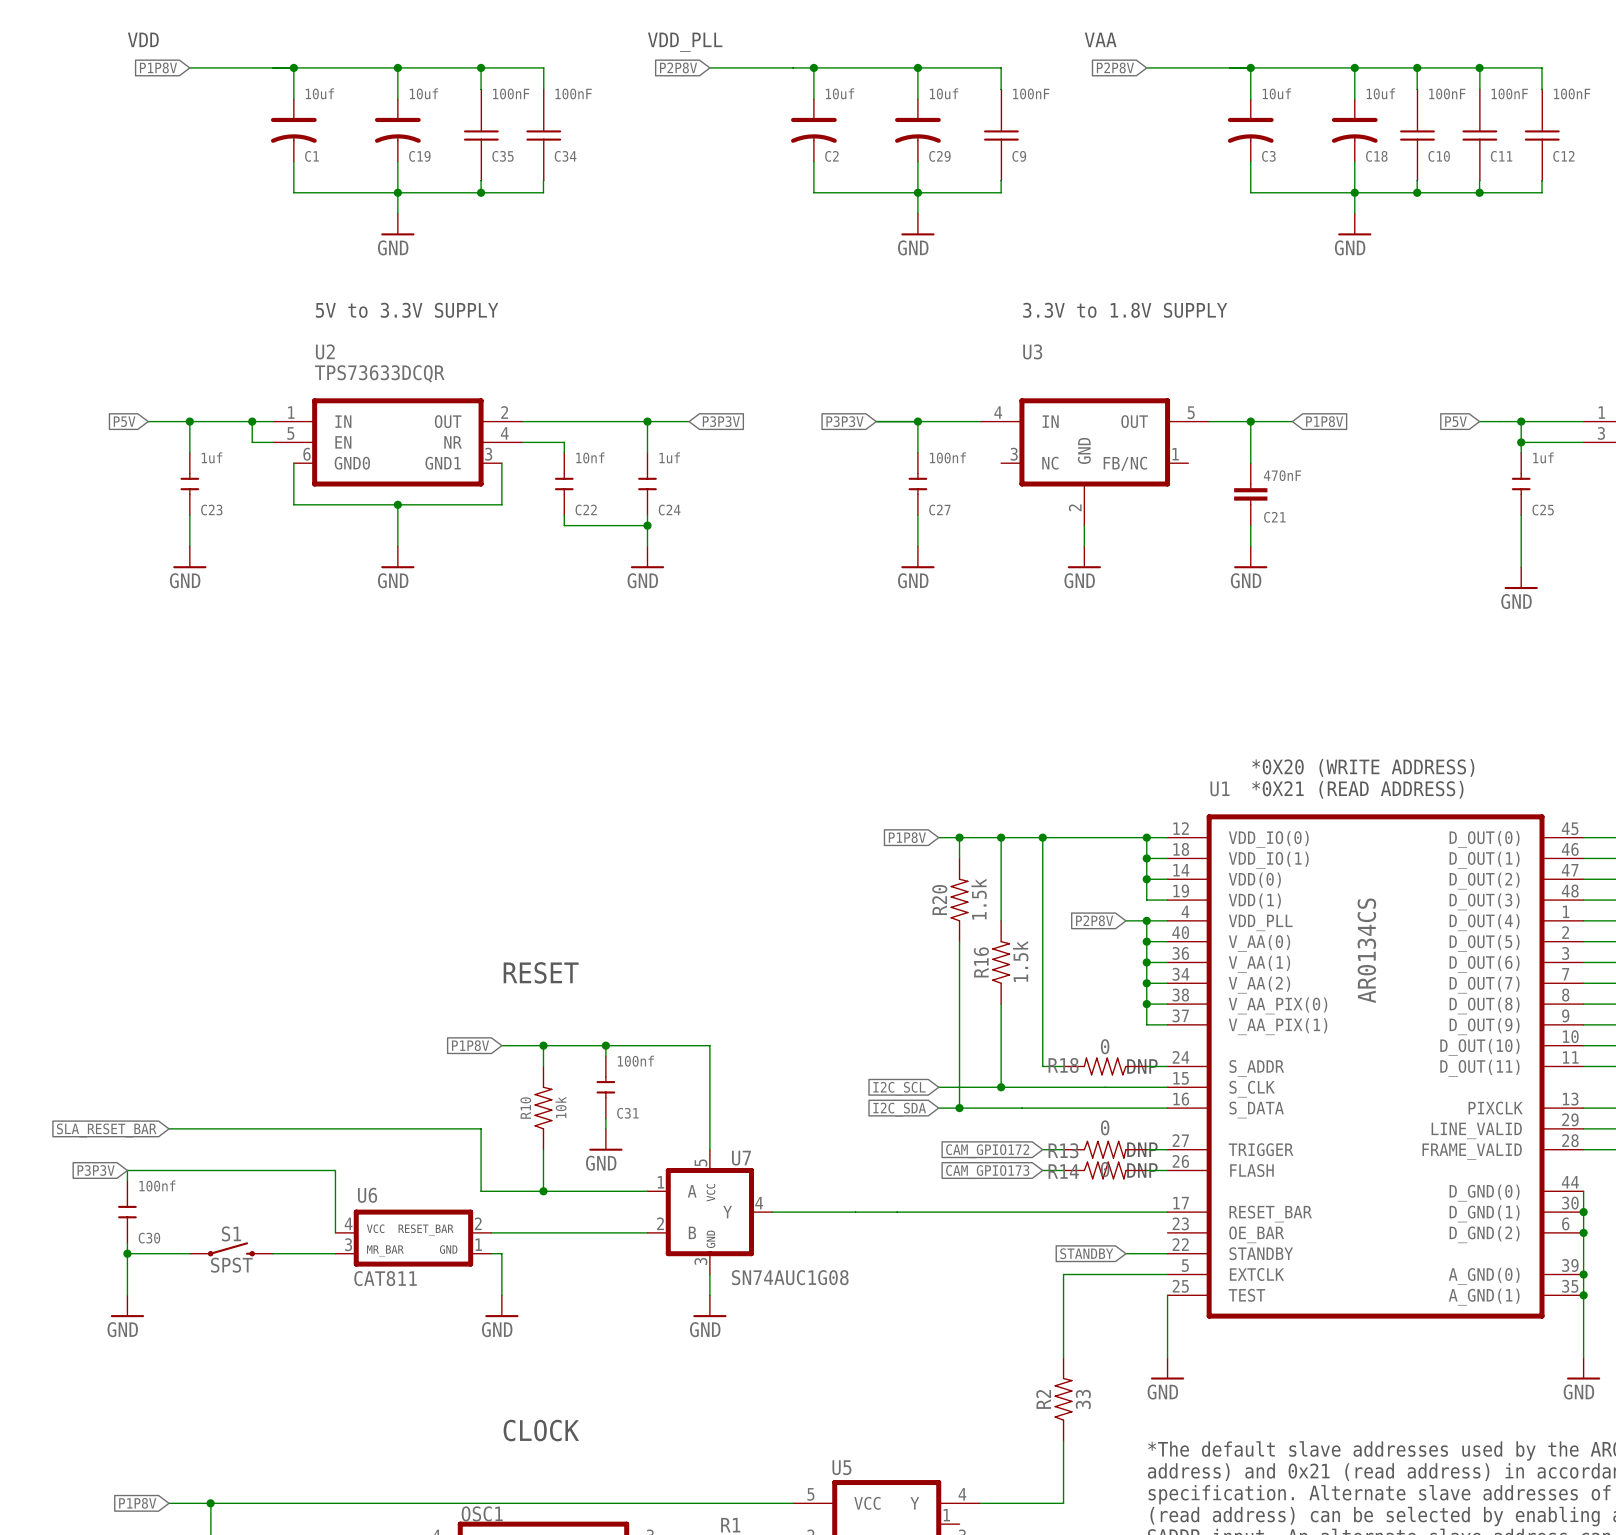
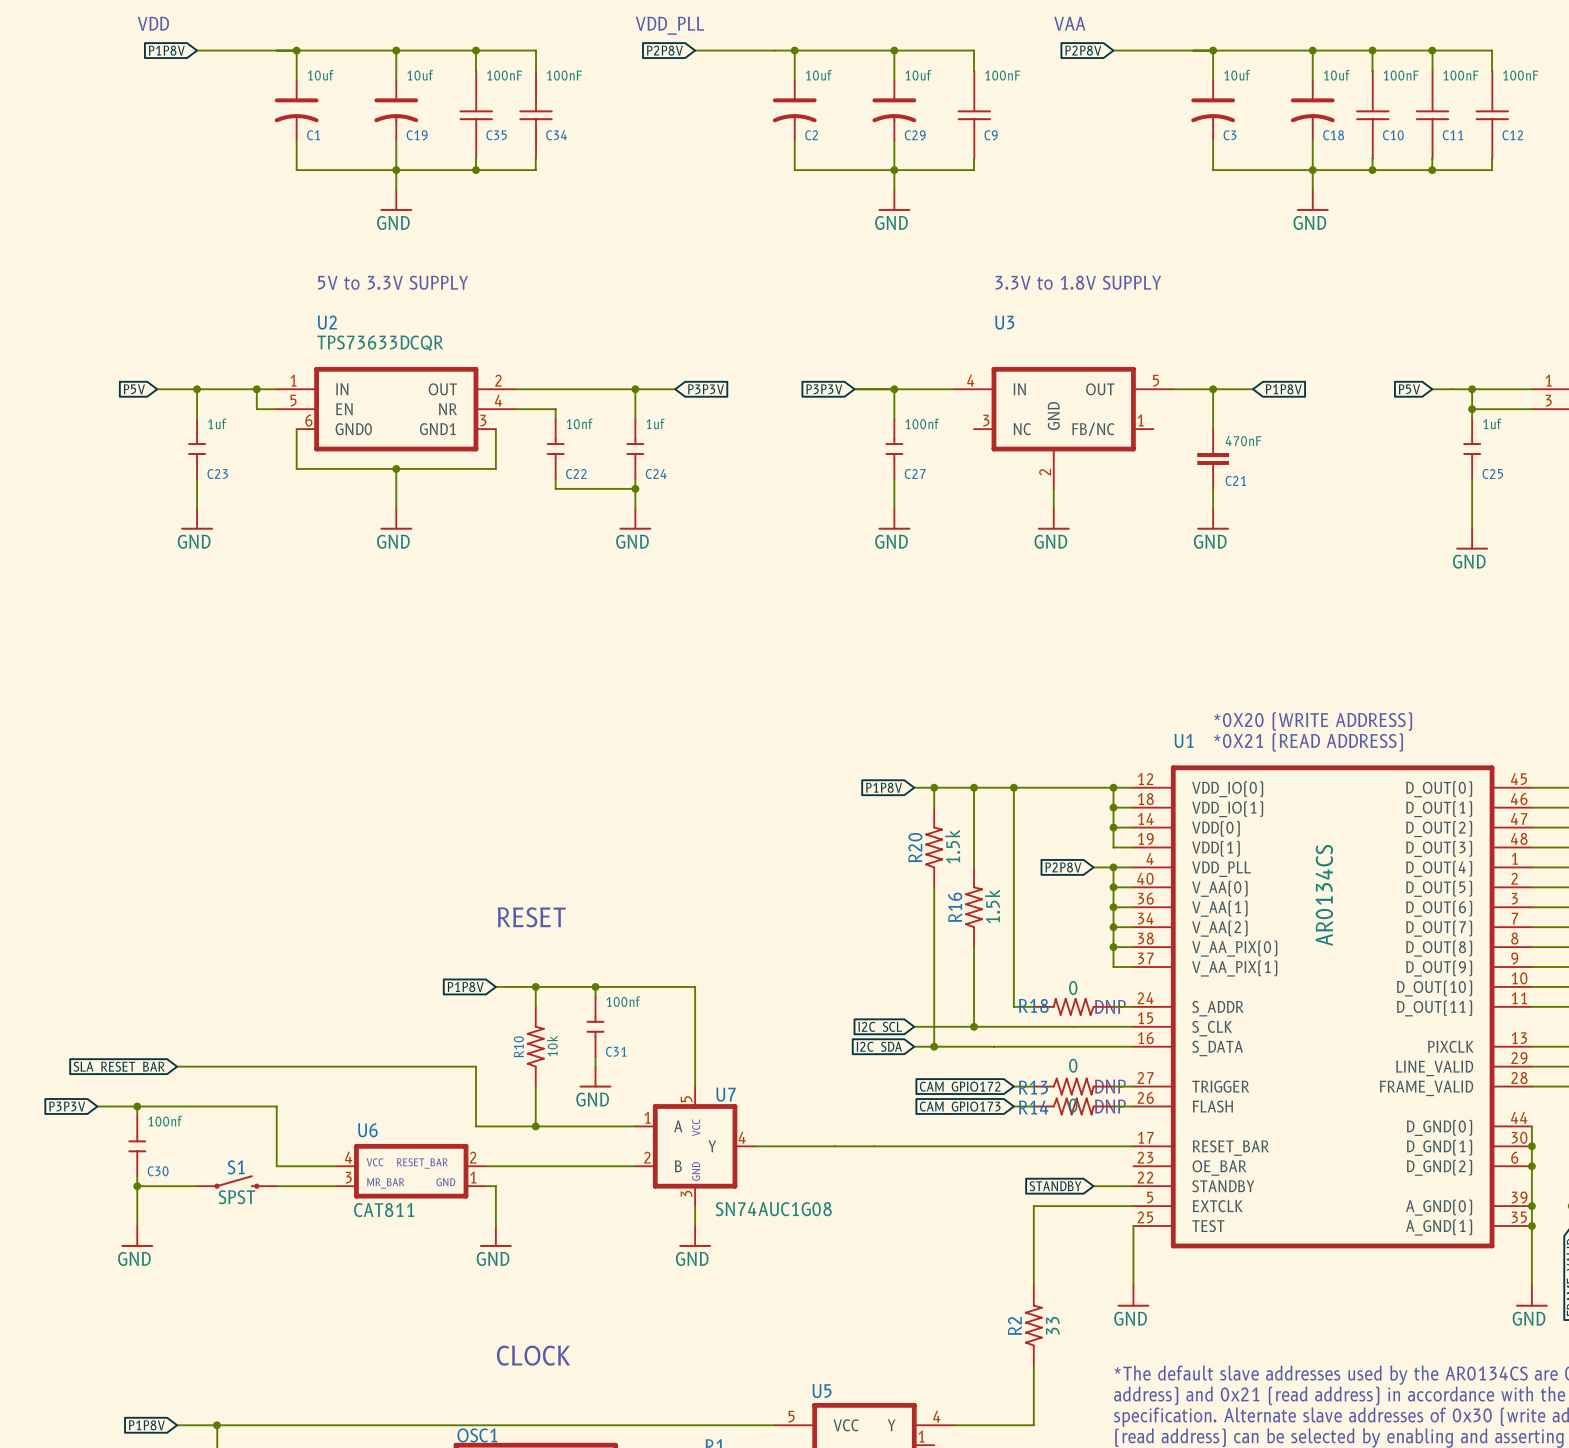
wire: none -> (97, 1106) (137, 1106)
global label position: P3P3V (96, 1170) -> P3P3V (67, 1106)
junction: none -> (137, 1106)
wire: (273, 1170) (335, 1170) (335, 1232) -> (276, 1106) (276, 1166) (336, 1166)

